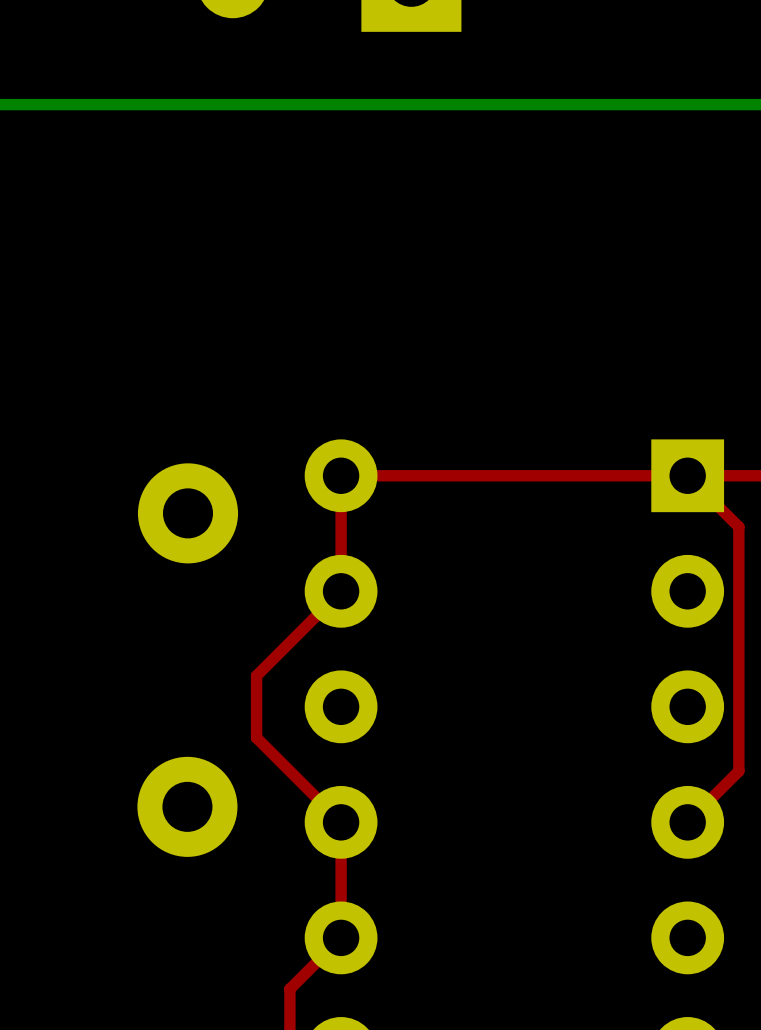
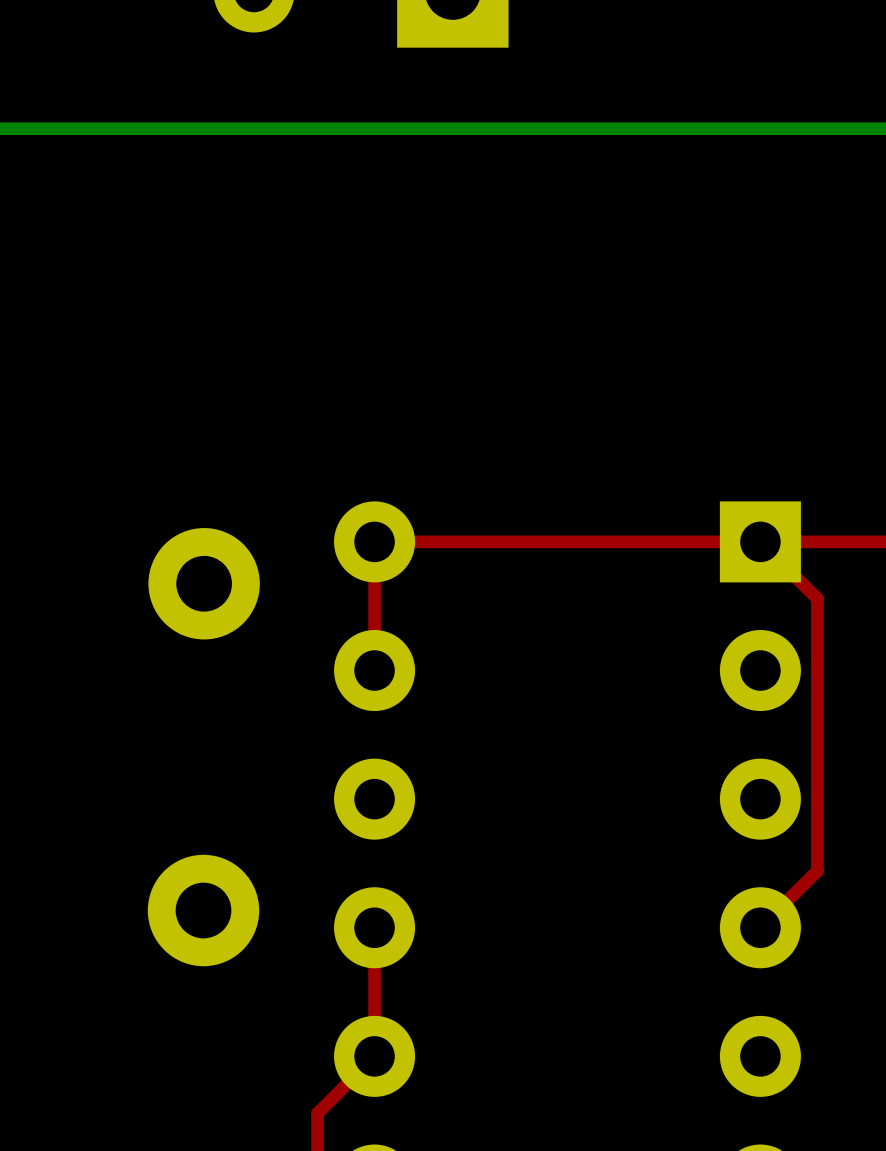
top track: (341, 591) (256, 675) (256, 737) (341, 822) -> none

